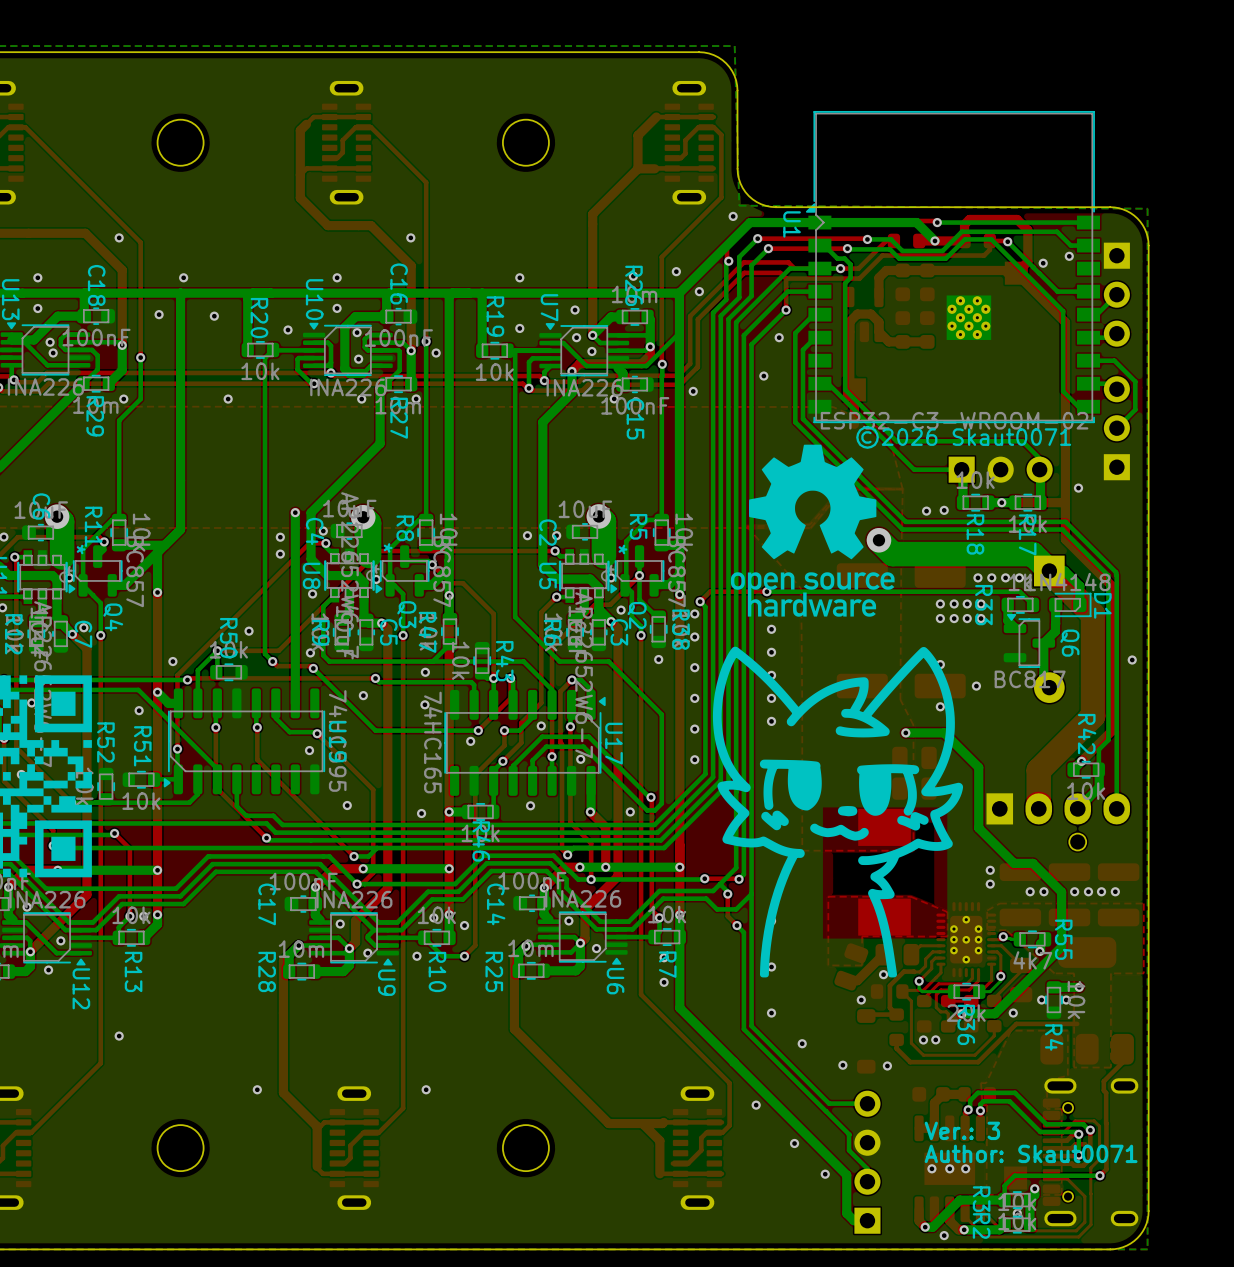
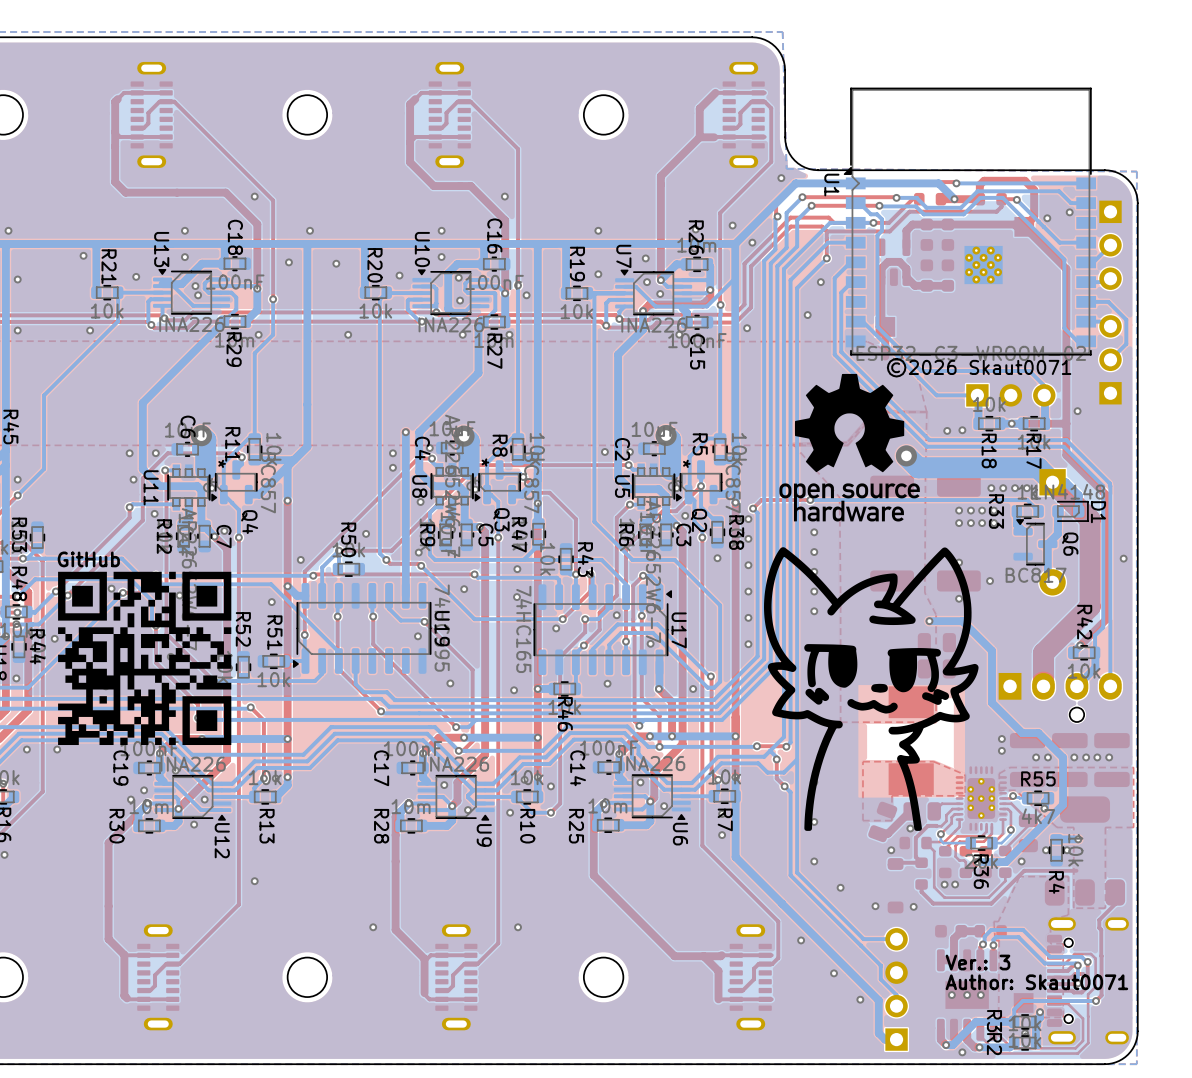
R55 name rotation: 0° (1063, 939) -> 90° counterclockwise (1038, 778)

